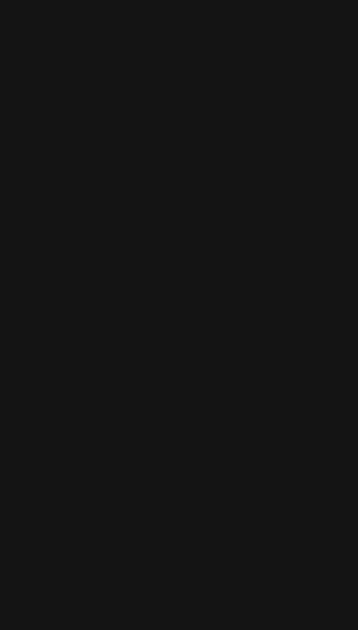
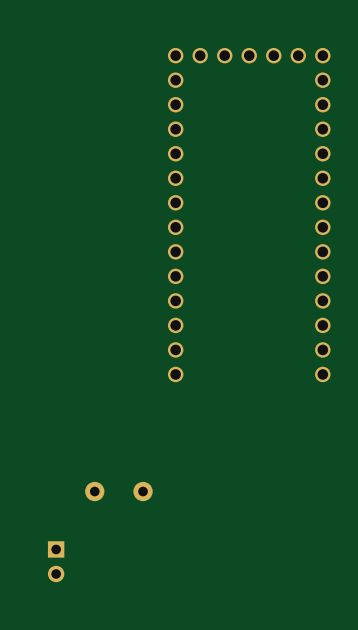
part: none -> (249, 215)
part: none -> (94, 491)
part: none -> (143, 491)
part: none -> (56, 561)

